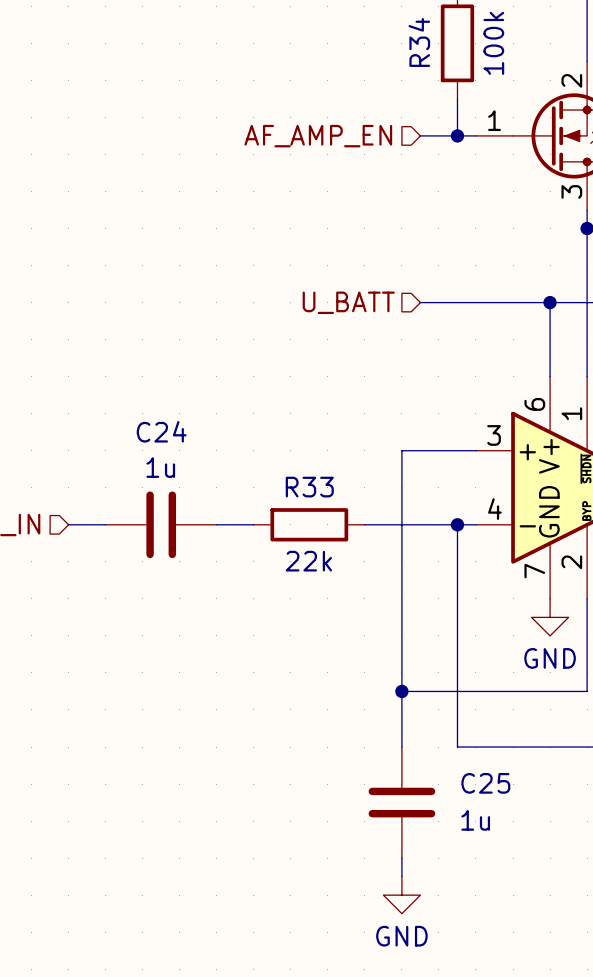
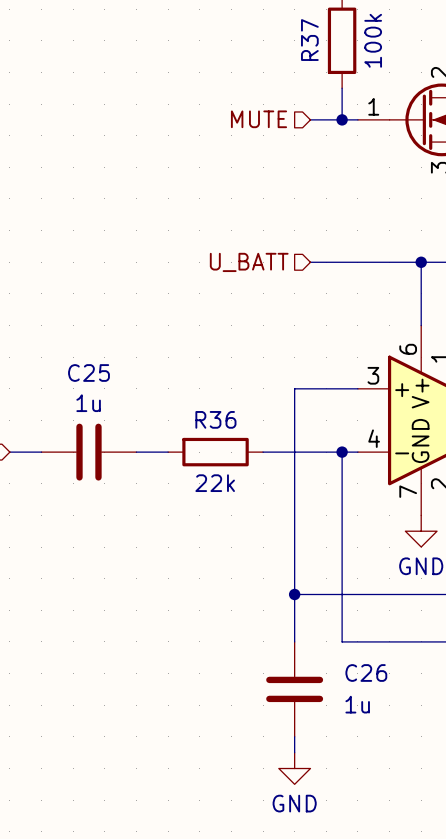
R34 name: R34 (419, 42) -> R37 (309, 40)
hierarchical label: AF_AMP_EN (318, 136) -> MUTE (258, 119)
C24 name: C24 (161, 431) -> C25 (88, 373)
R33 name: R33 (309, 487) -> R36 (215, 419)
C25 name: C25 (485, 783) -> C26 (366, 673)

